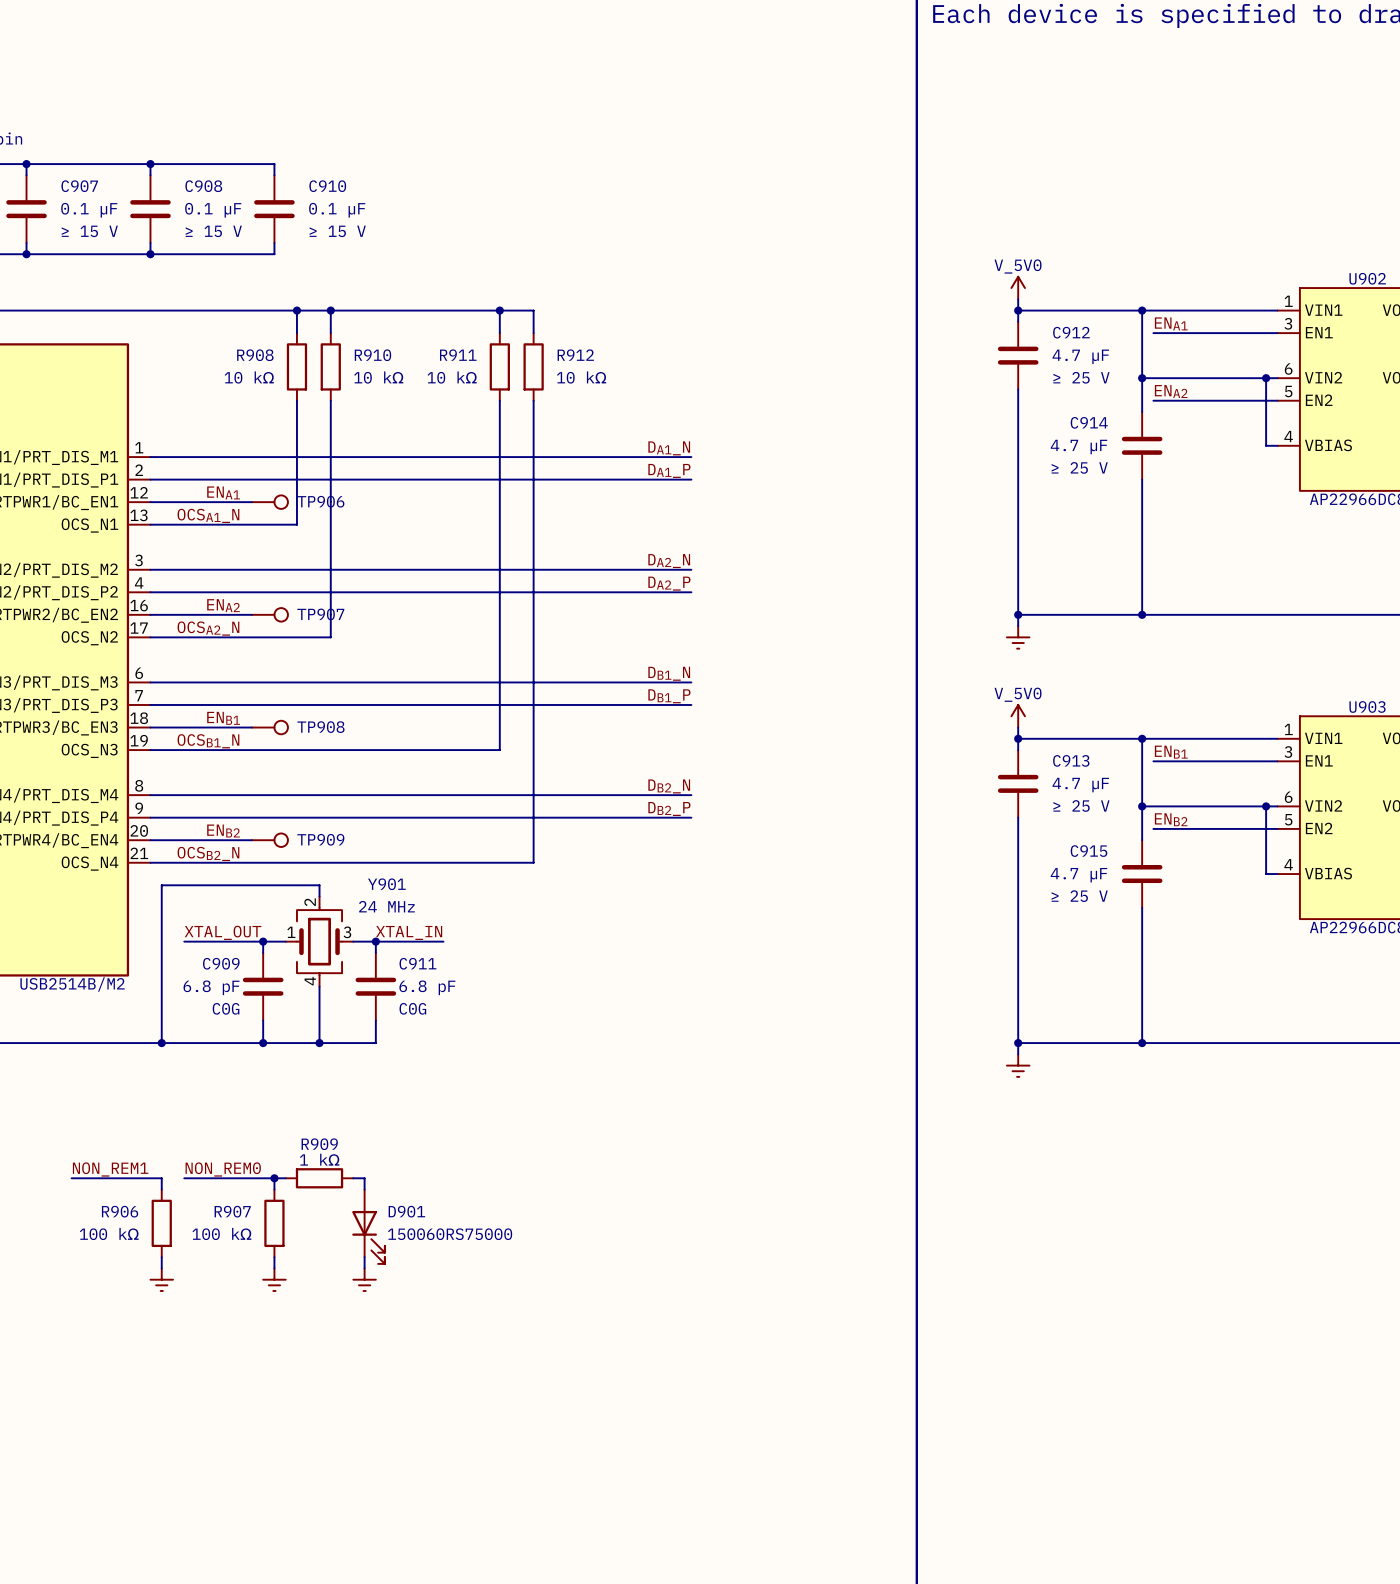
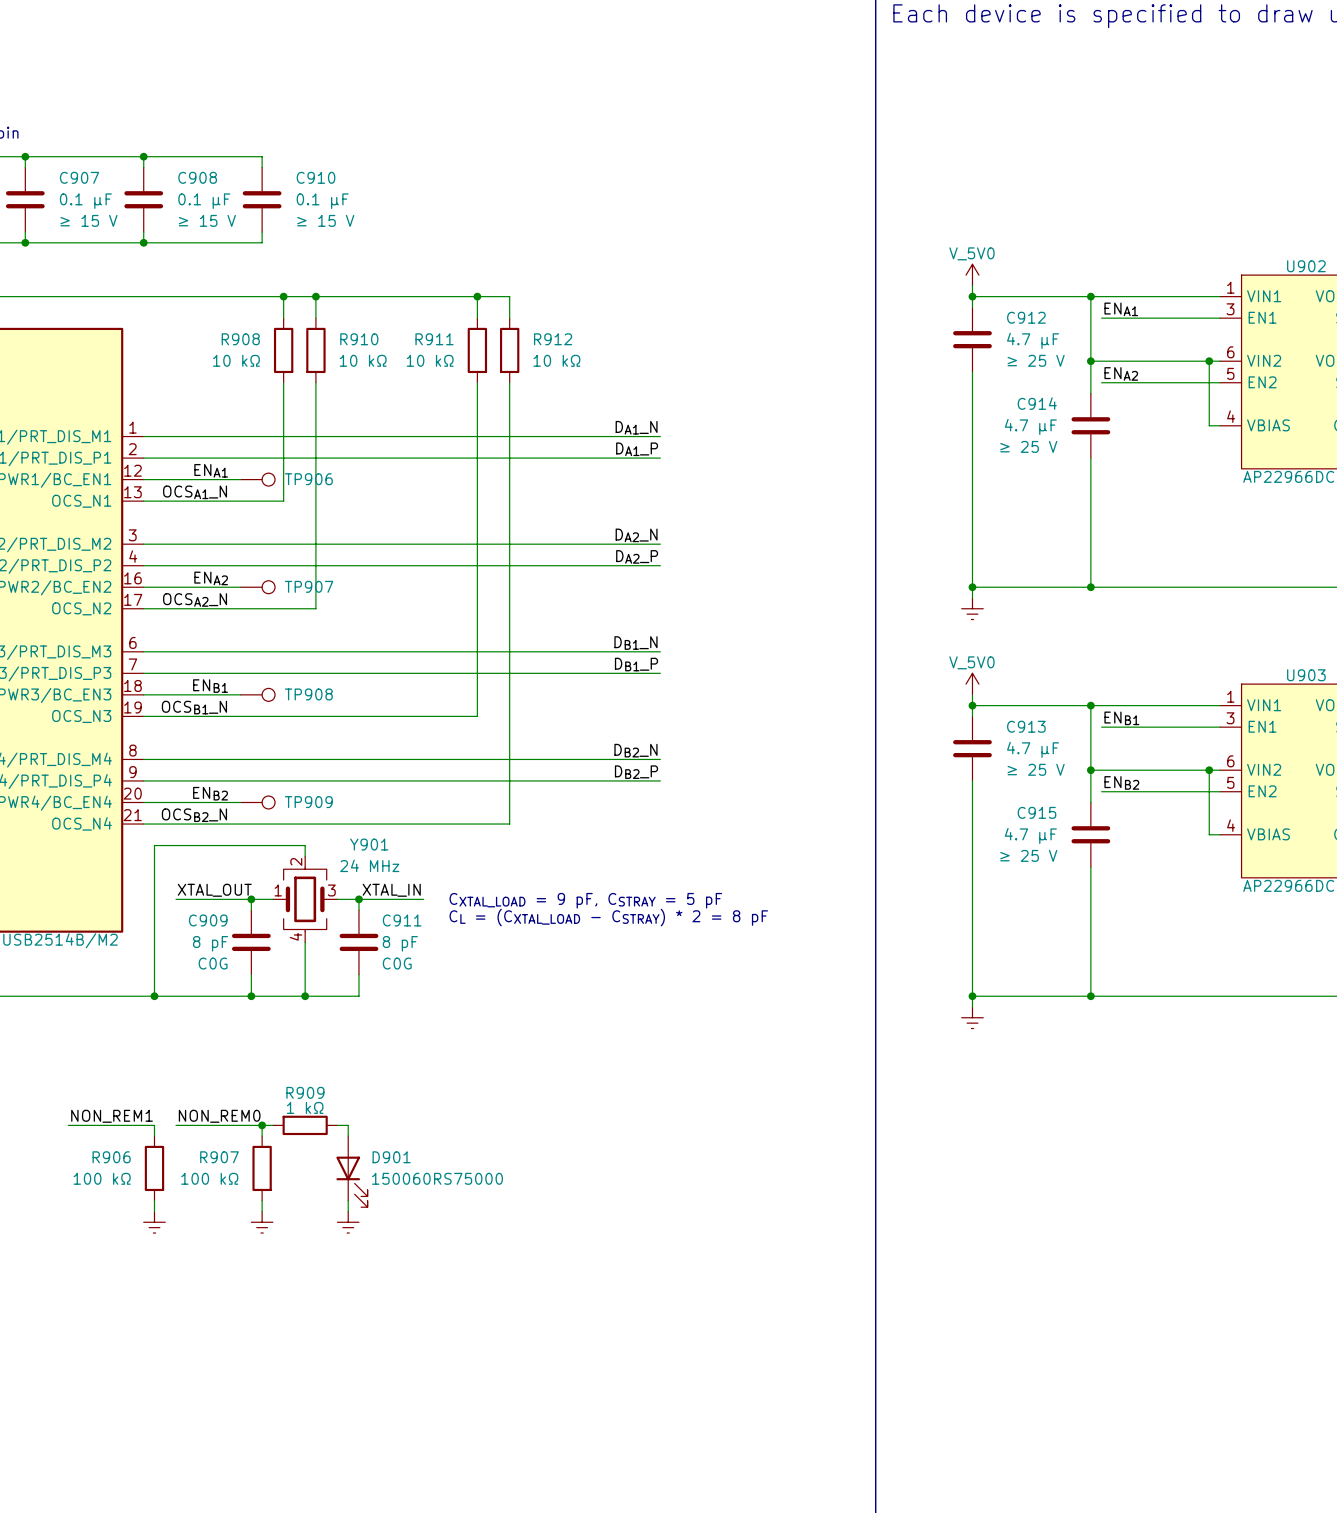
text: none -> CXTAL_LOAD = 9 pF, CSTRAY = 5 pF (585, 900)
text: none -> CL = (CXTAL_LOAD - CSTRAY) * 2 = 8 pF (608, 917)
C909 value: 6.8 pF (211, 987) -> 8 pF (210, 943)
C911 value: 6.8 pF (427, 987) -> 8 pF (400, 943)

